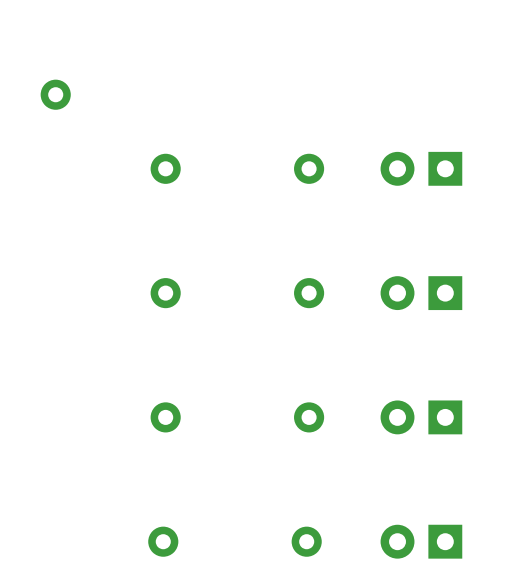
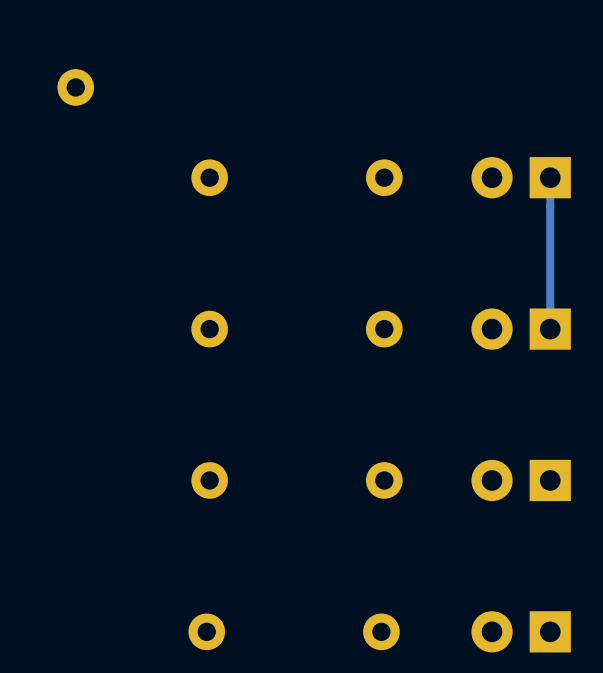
track: none -> (550, 177) (550, 329)

